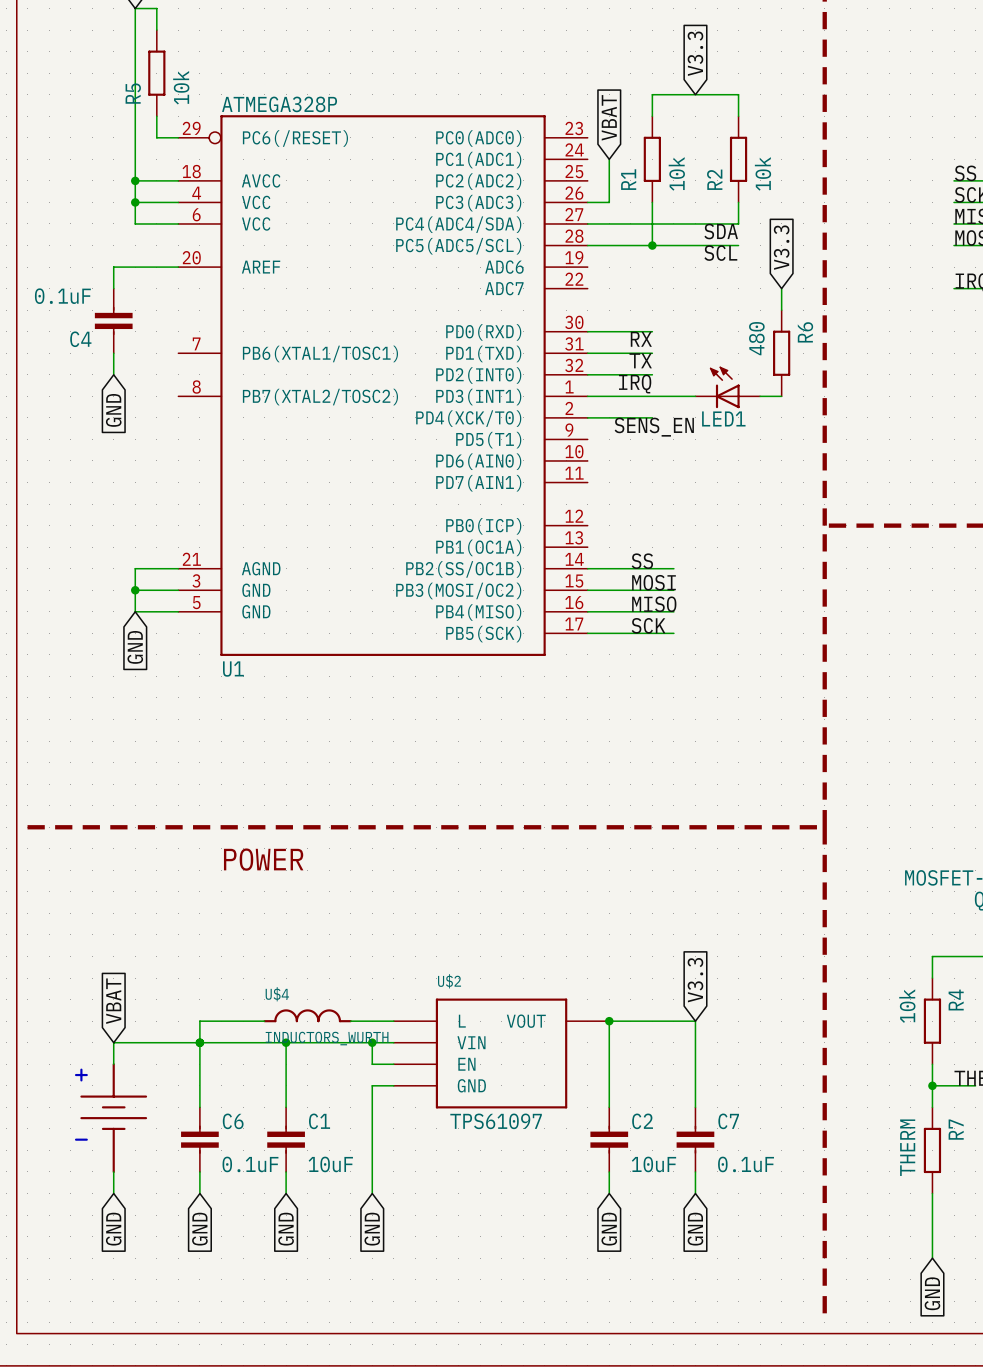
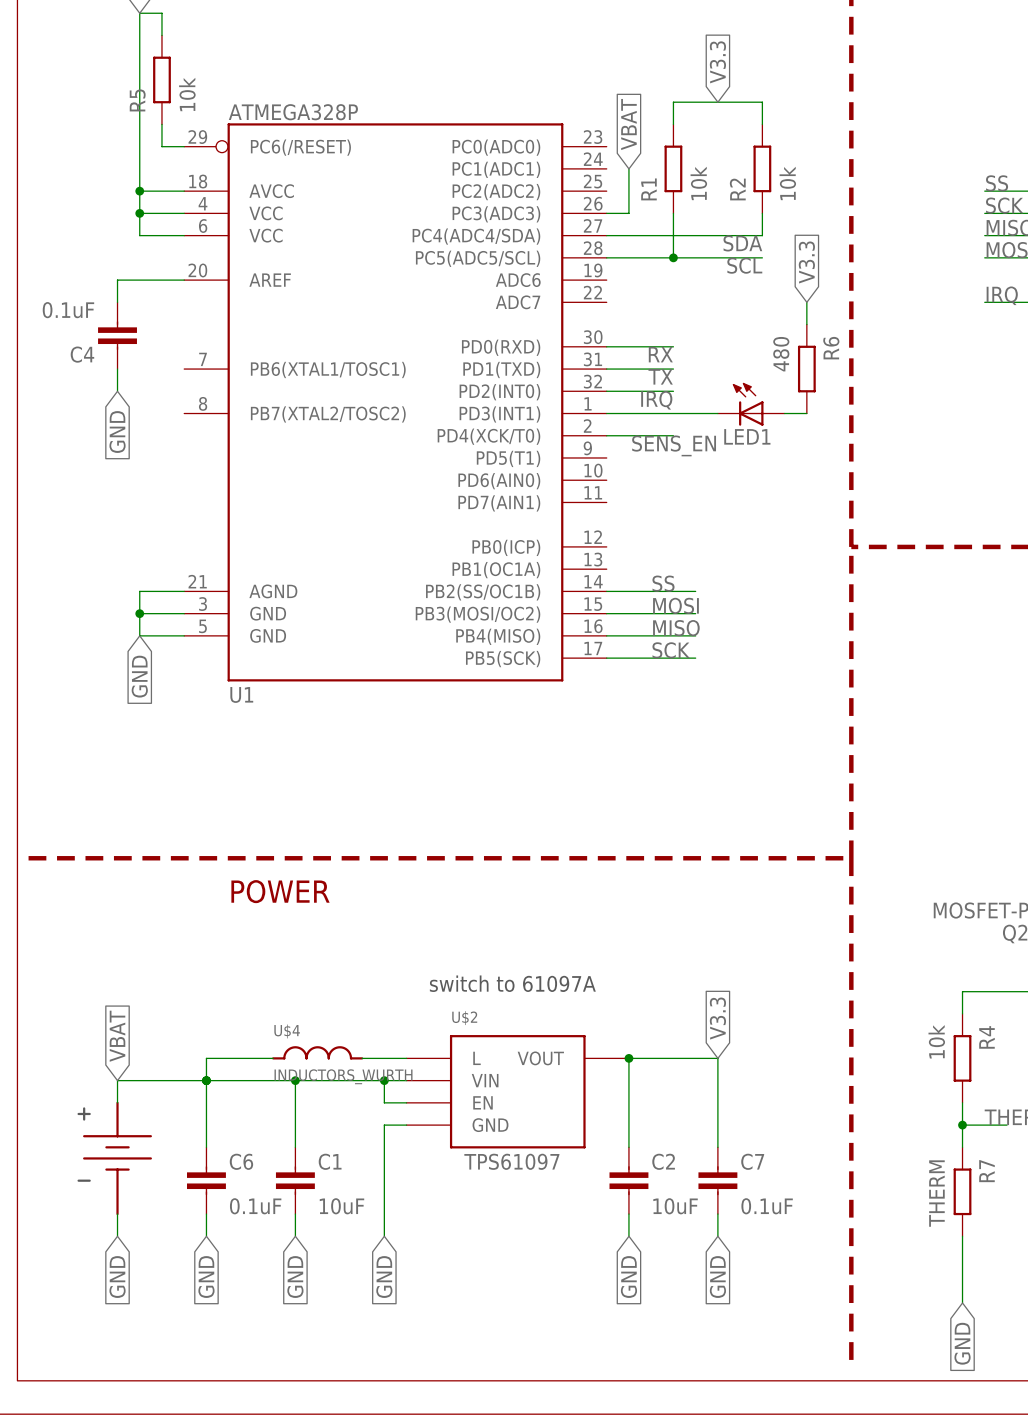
text: none -> switch to 61097A (512, 983)

